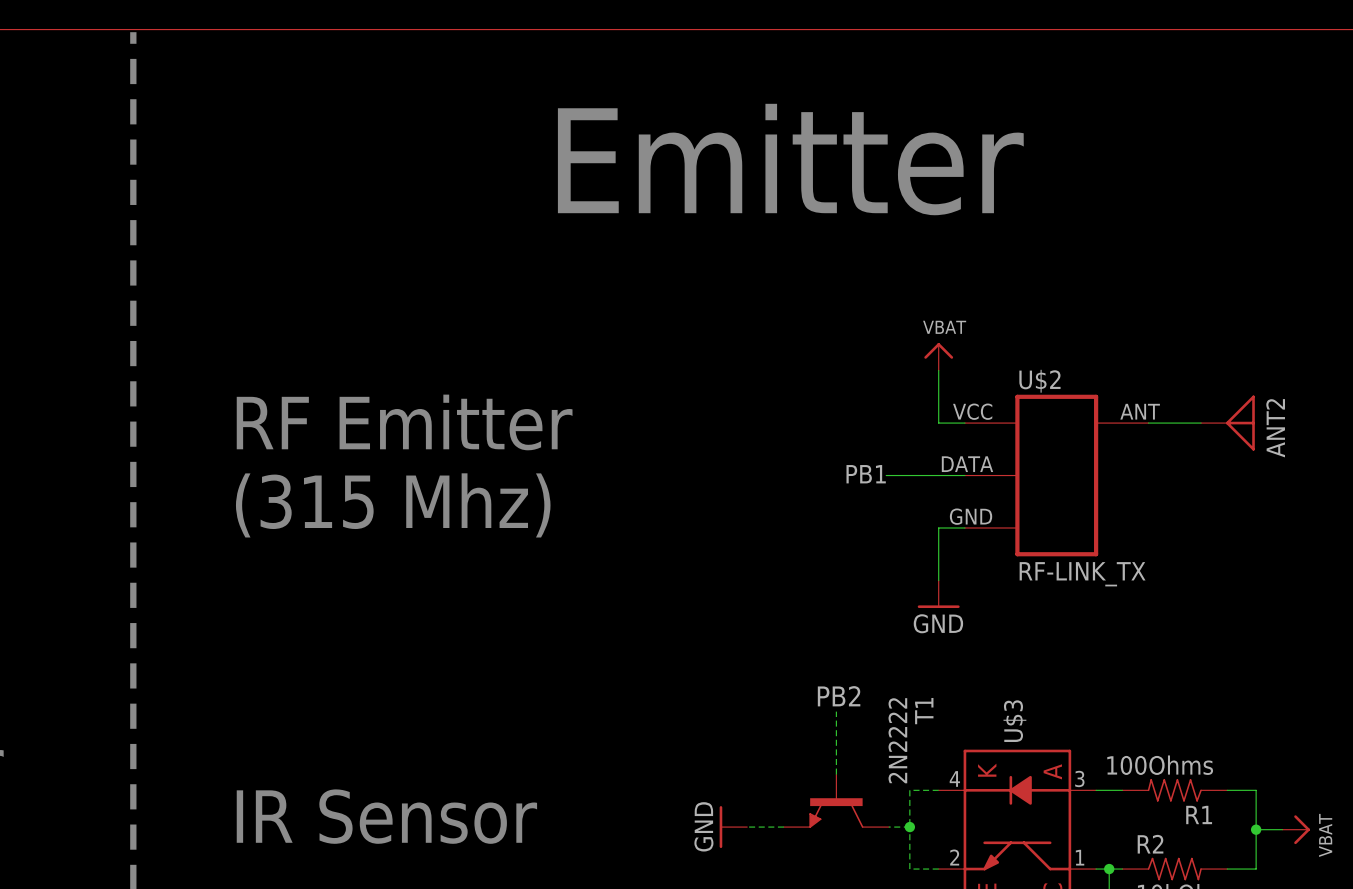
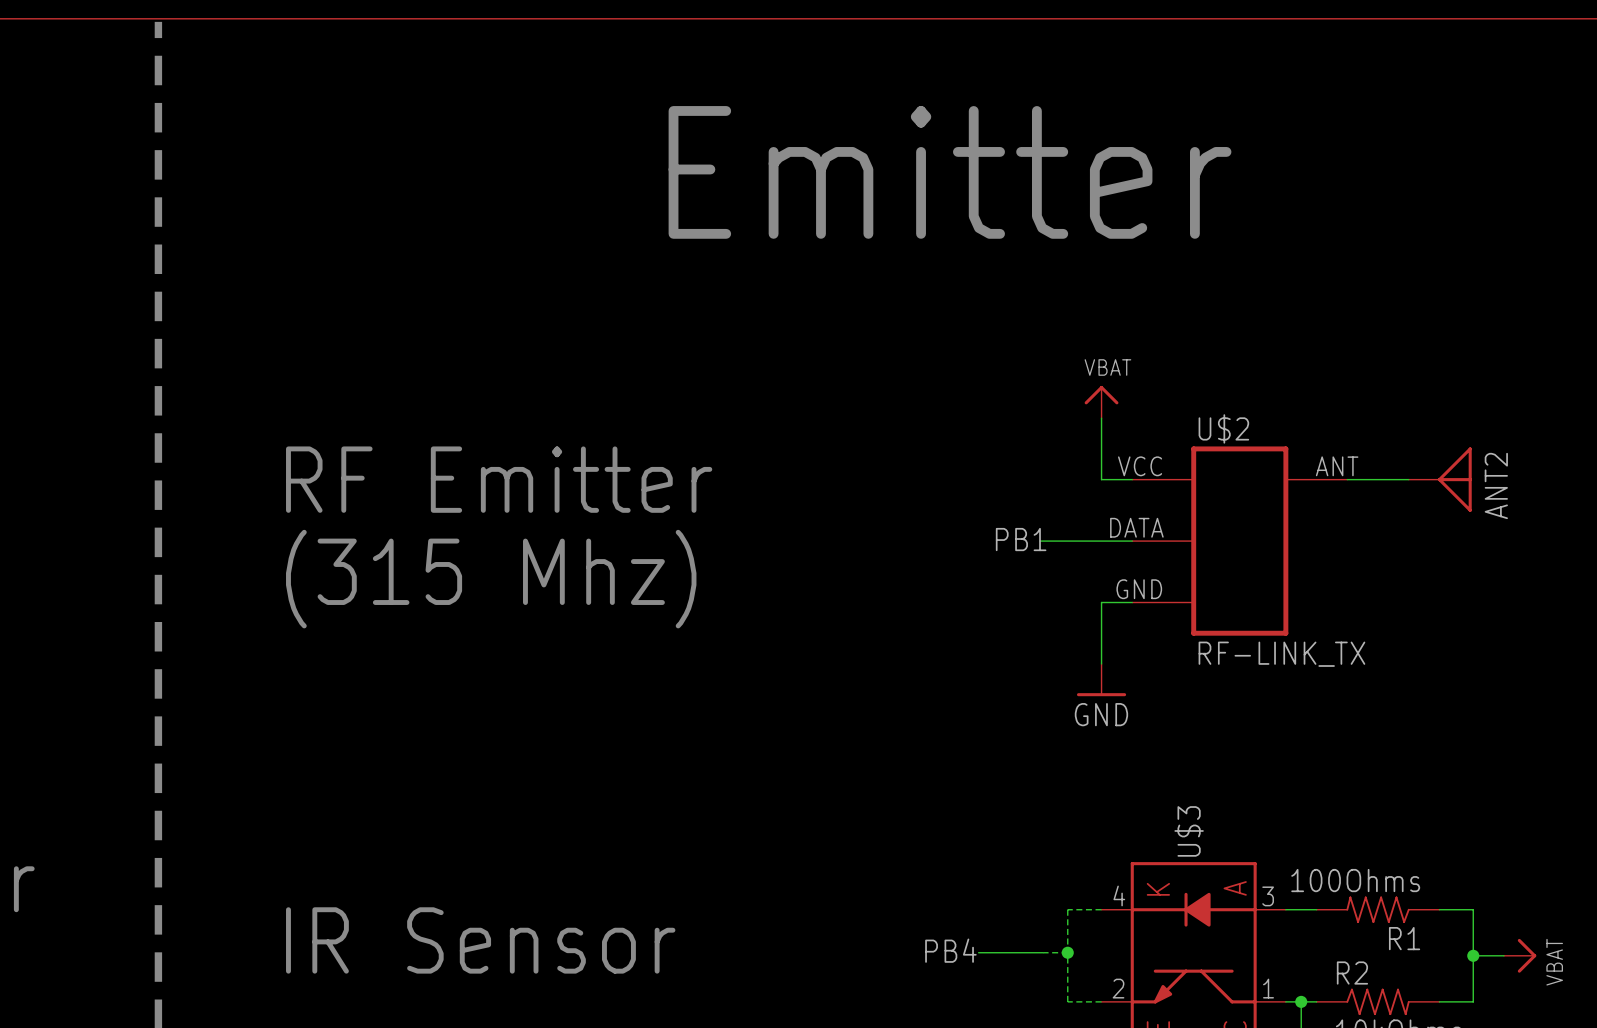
label: PB2 (839, 696) -> none
wire: (836, 711) (836, 774) -> none
T1: 2N2222 (836, 801) -> none
label: none -> PB4 (950, 950)
power symbol: GND (733, 827) -> none
wire: (747, 827) (783, 827) -> none
wire: none -> (978, 952) (1043, 952)

